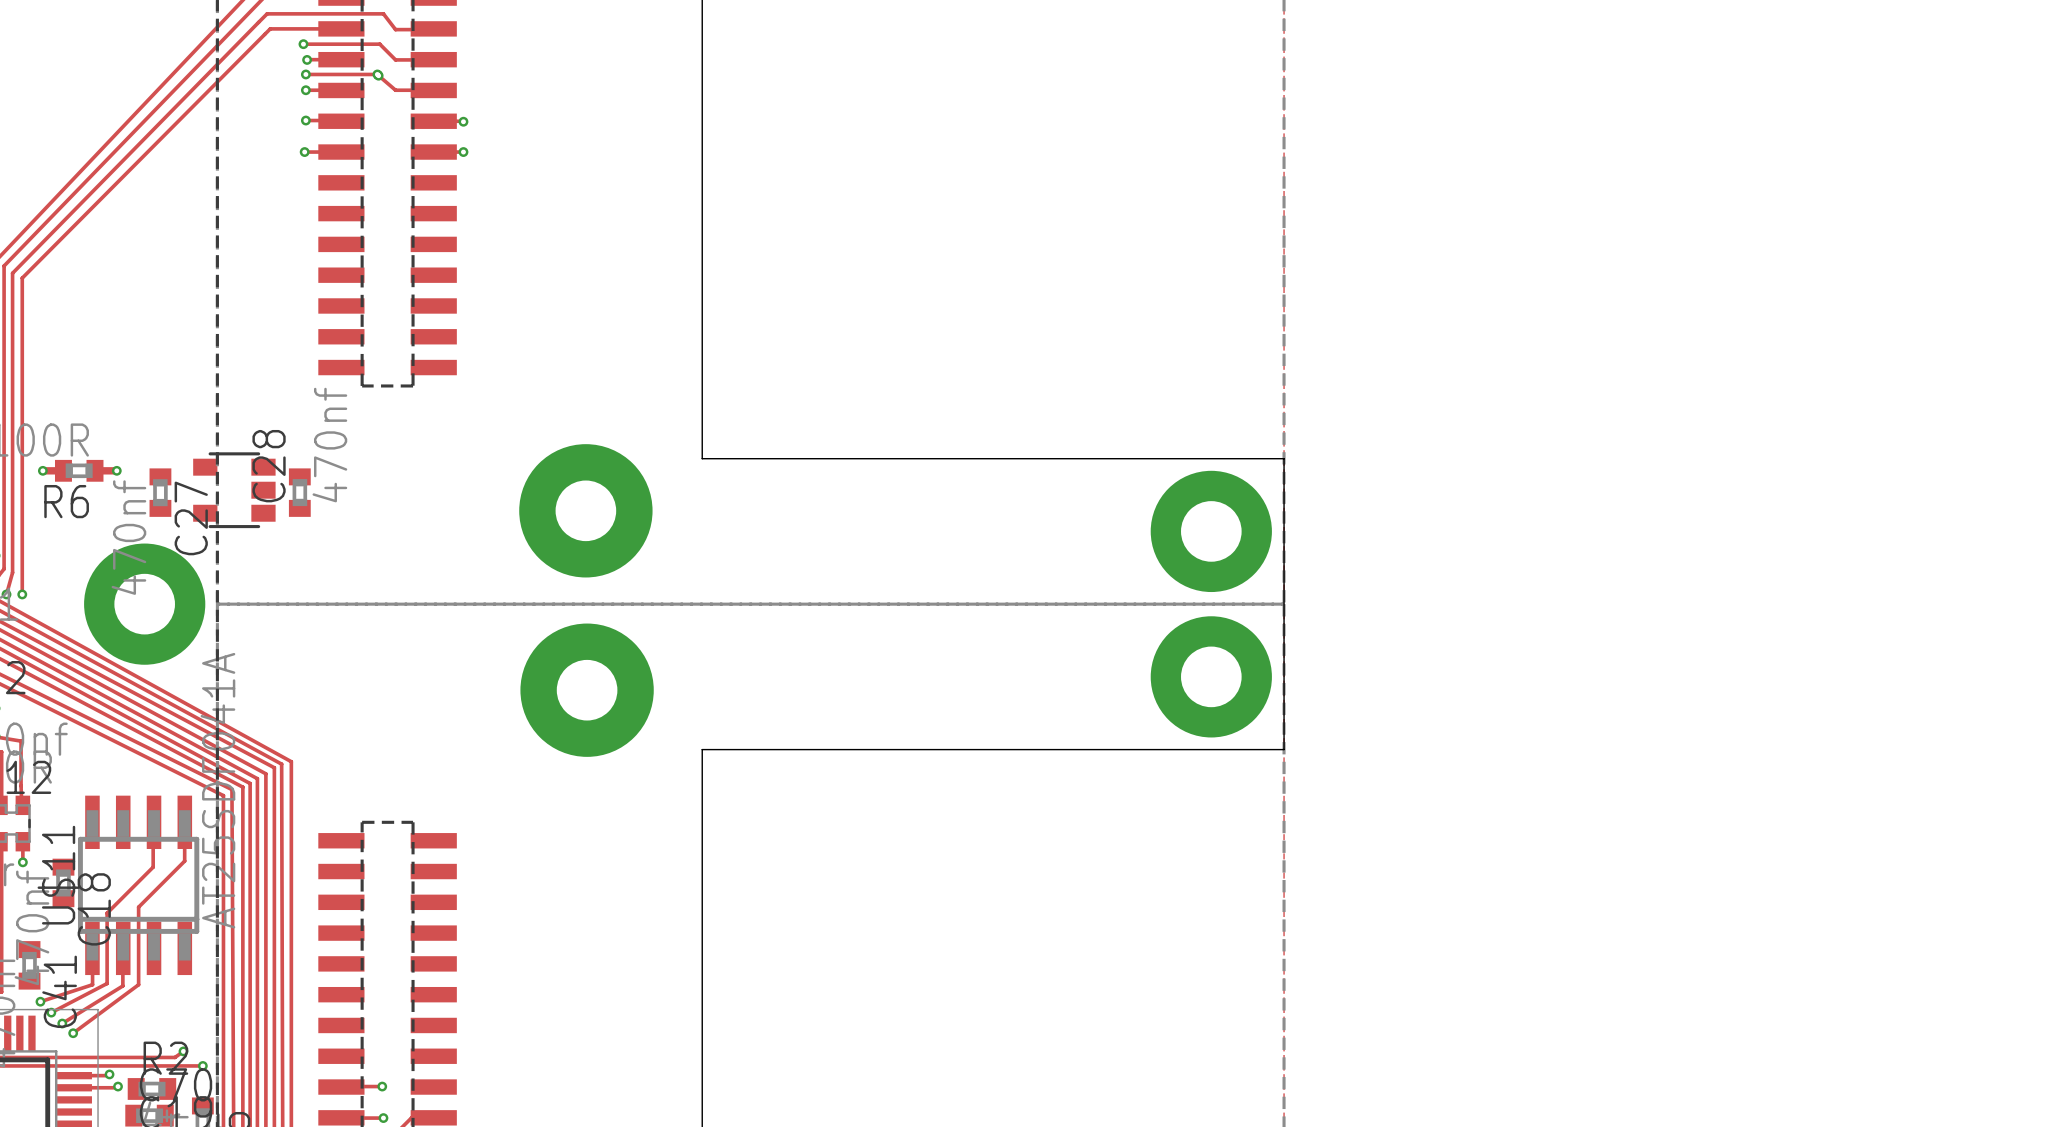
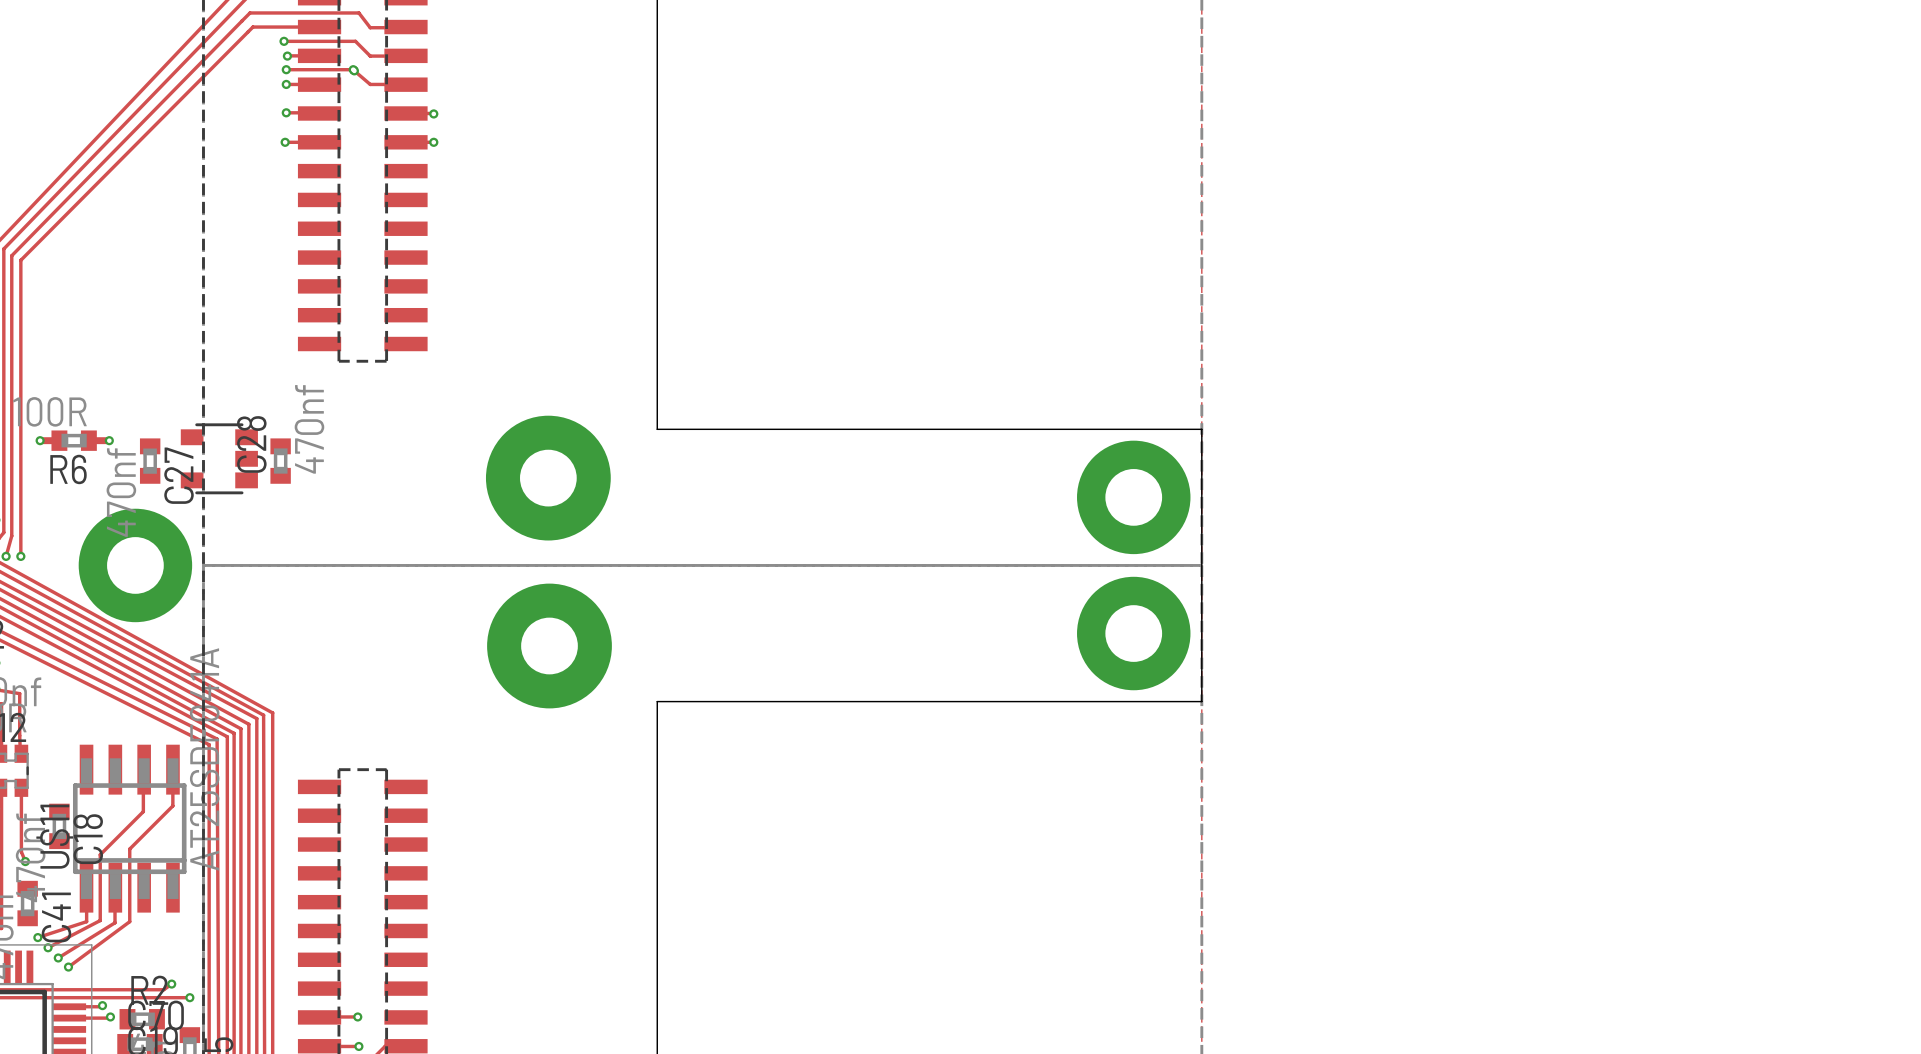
track: none -> (21, 807) (21, 851) (25, 861)
via position: (22, 862) -> (25, 861)

